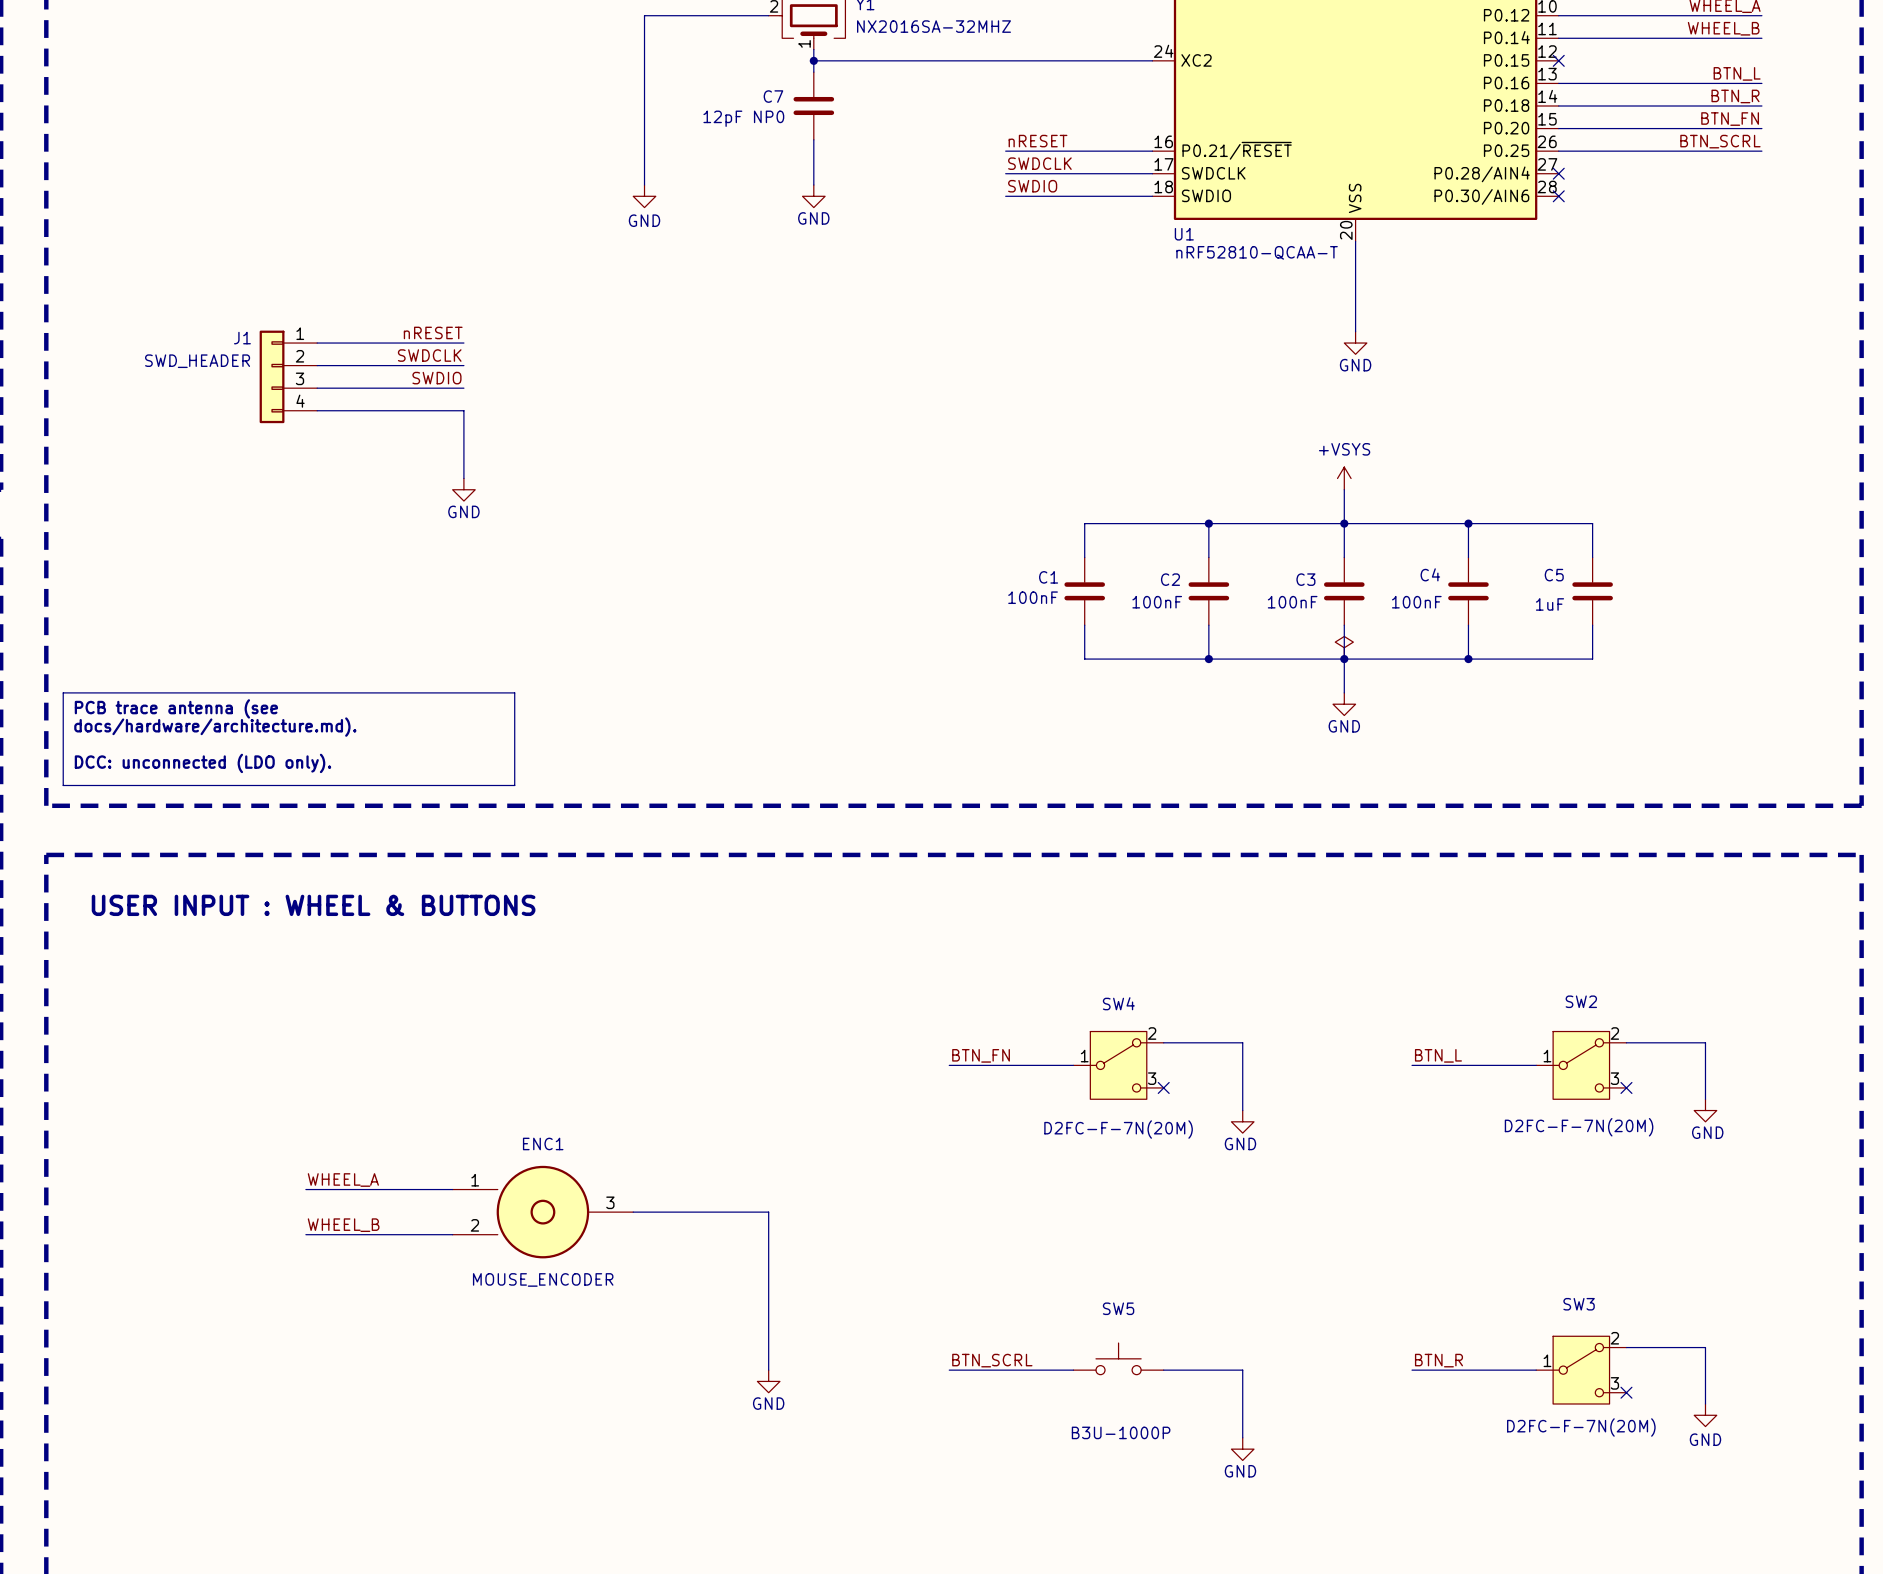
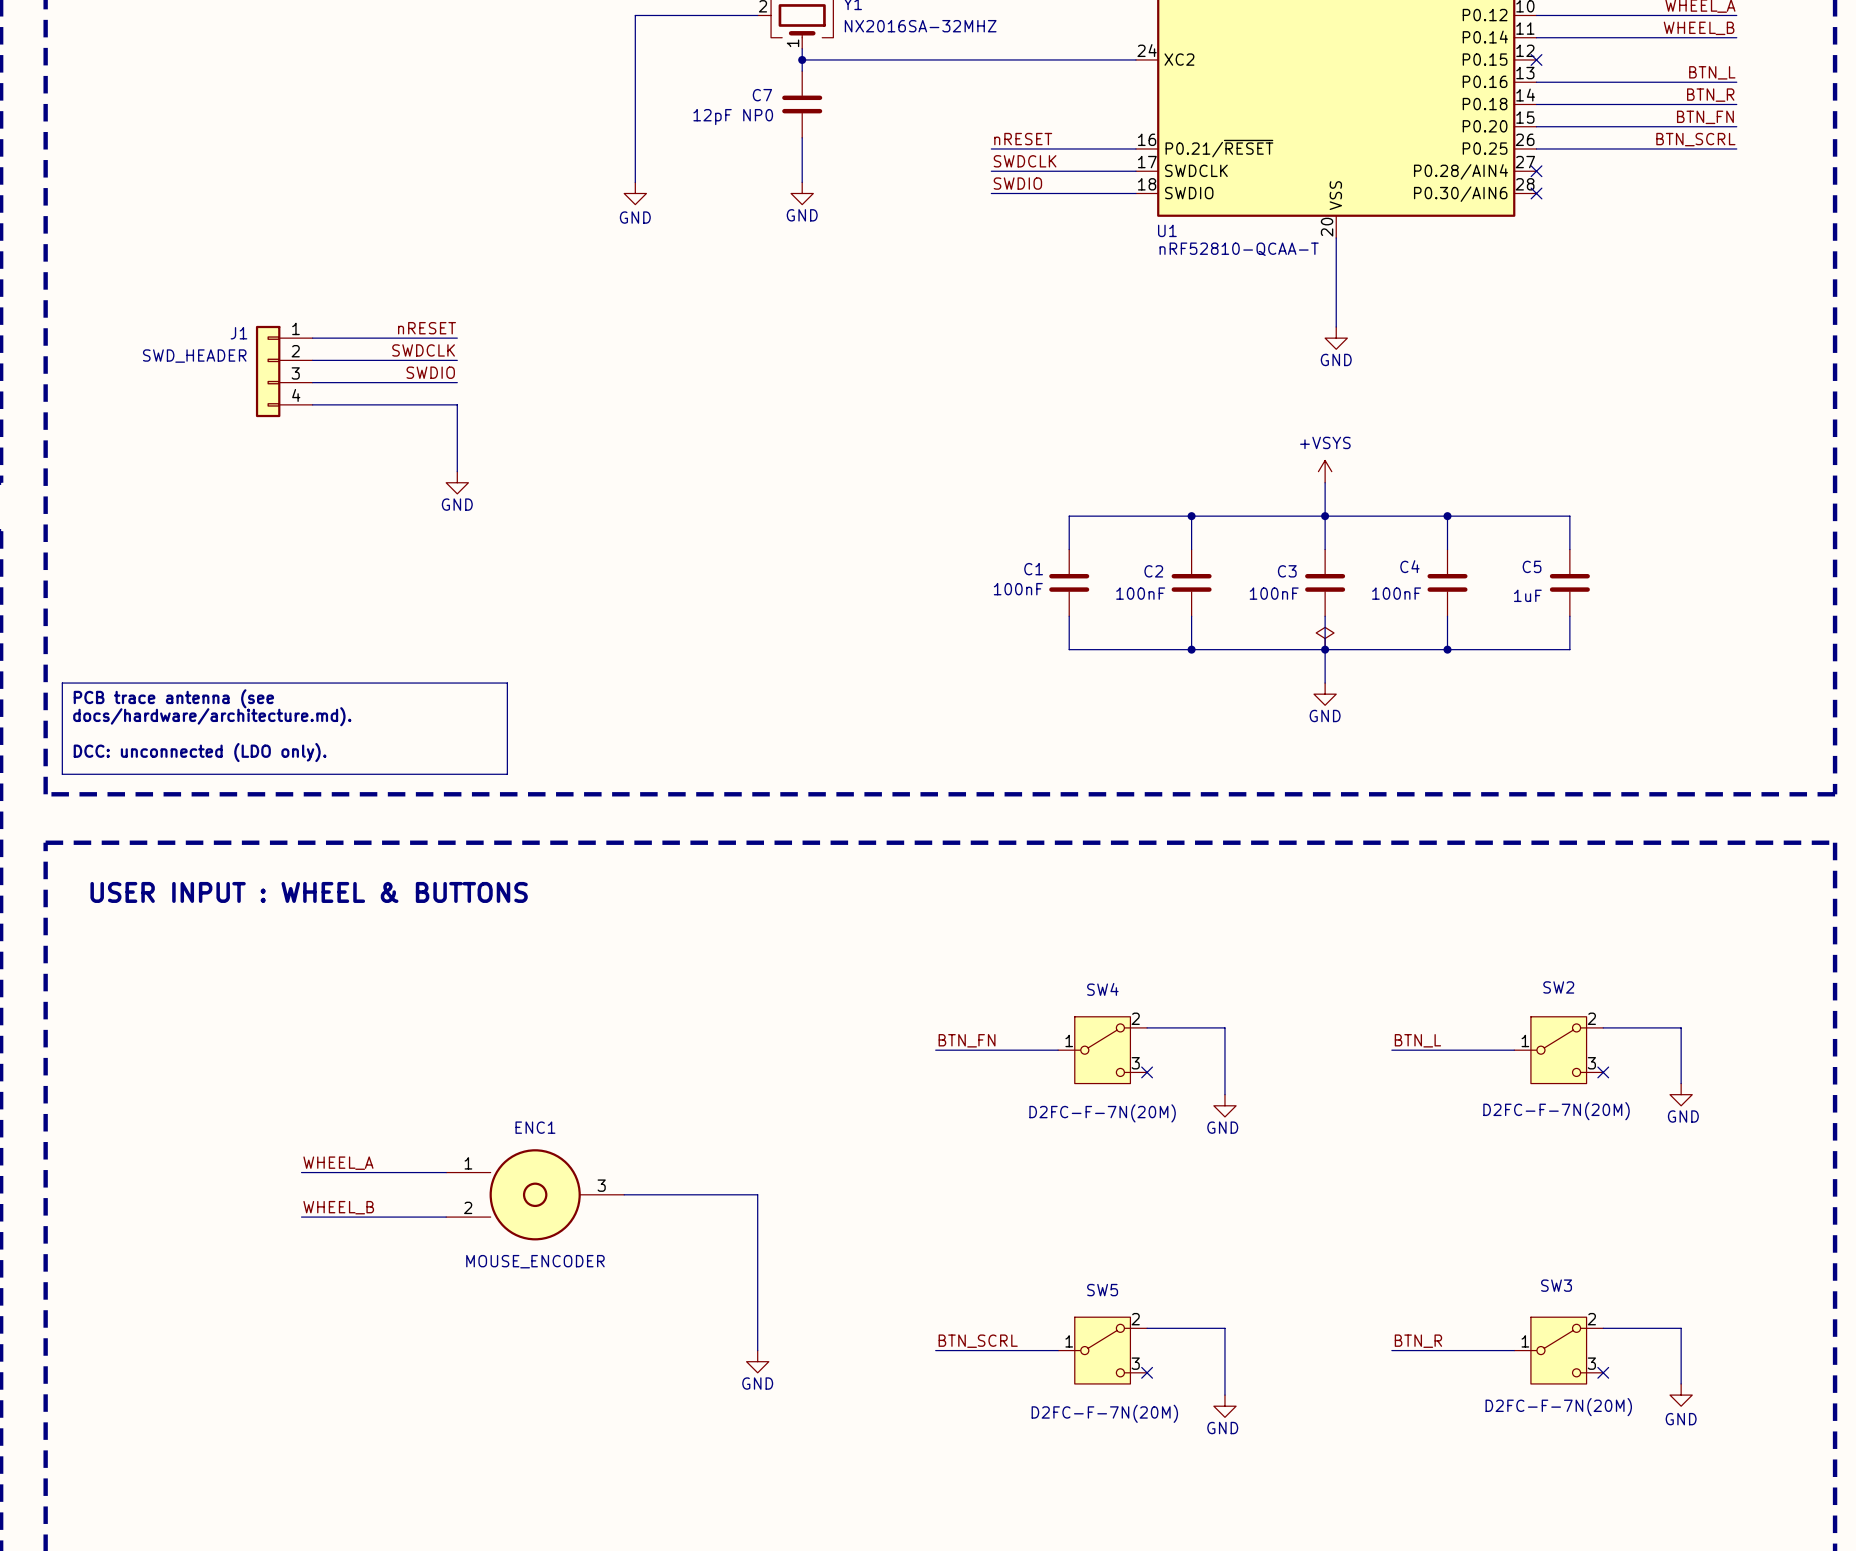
SW5 symbol: [1073, 1343, 1164, 1375] -> [1058, 1317, 1148, 1384]
wire: (1163, 1370) (1242, 1370) -> (1147, 1328) (1224, 1328) (1224, 1350)
no-connect mark: none -> (1147, 1372)
SW5 value: B3U-1000P (1121, 1432) -> D2FC-F-7N(20M) (1104, 1413)
power symbol position: GND (1242, 1449) -> GND (1224, 1406)

